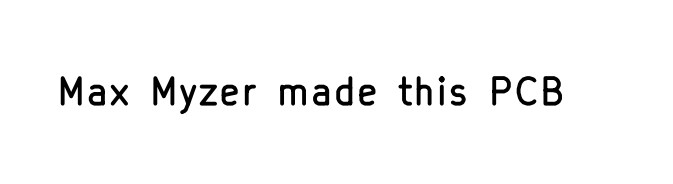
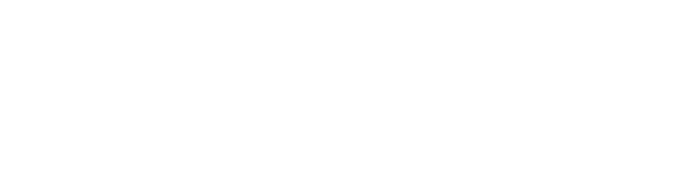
text: Max Myzer made this PCB (311, 95) -> none

